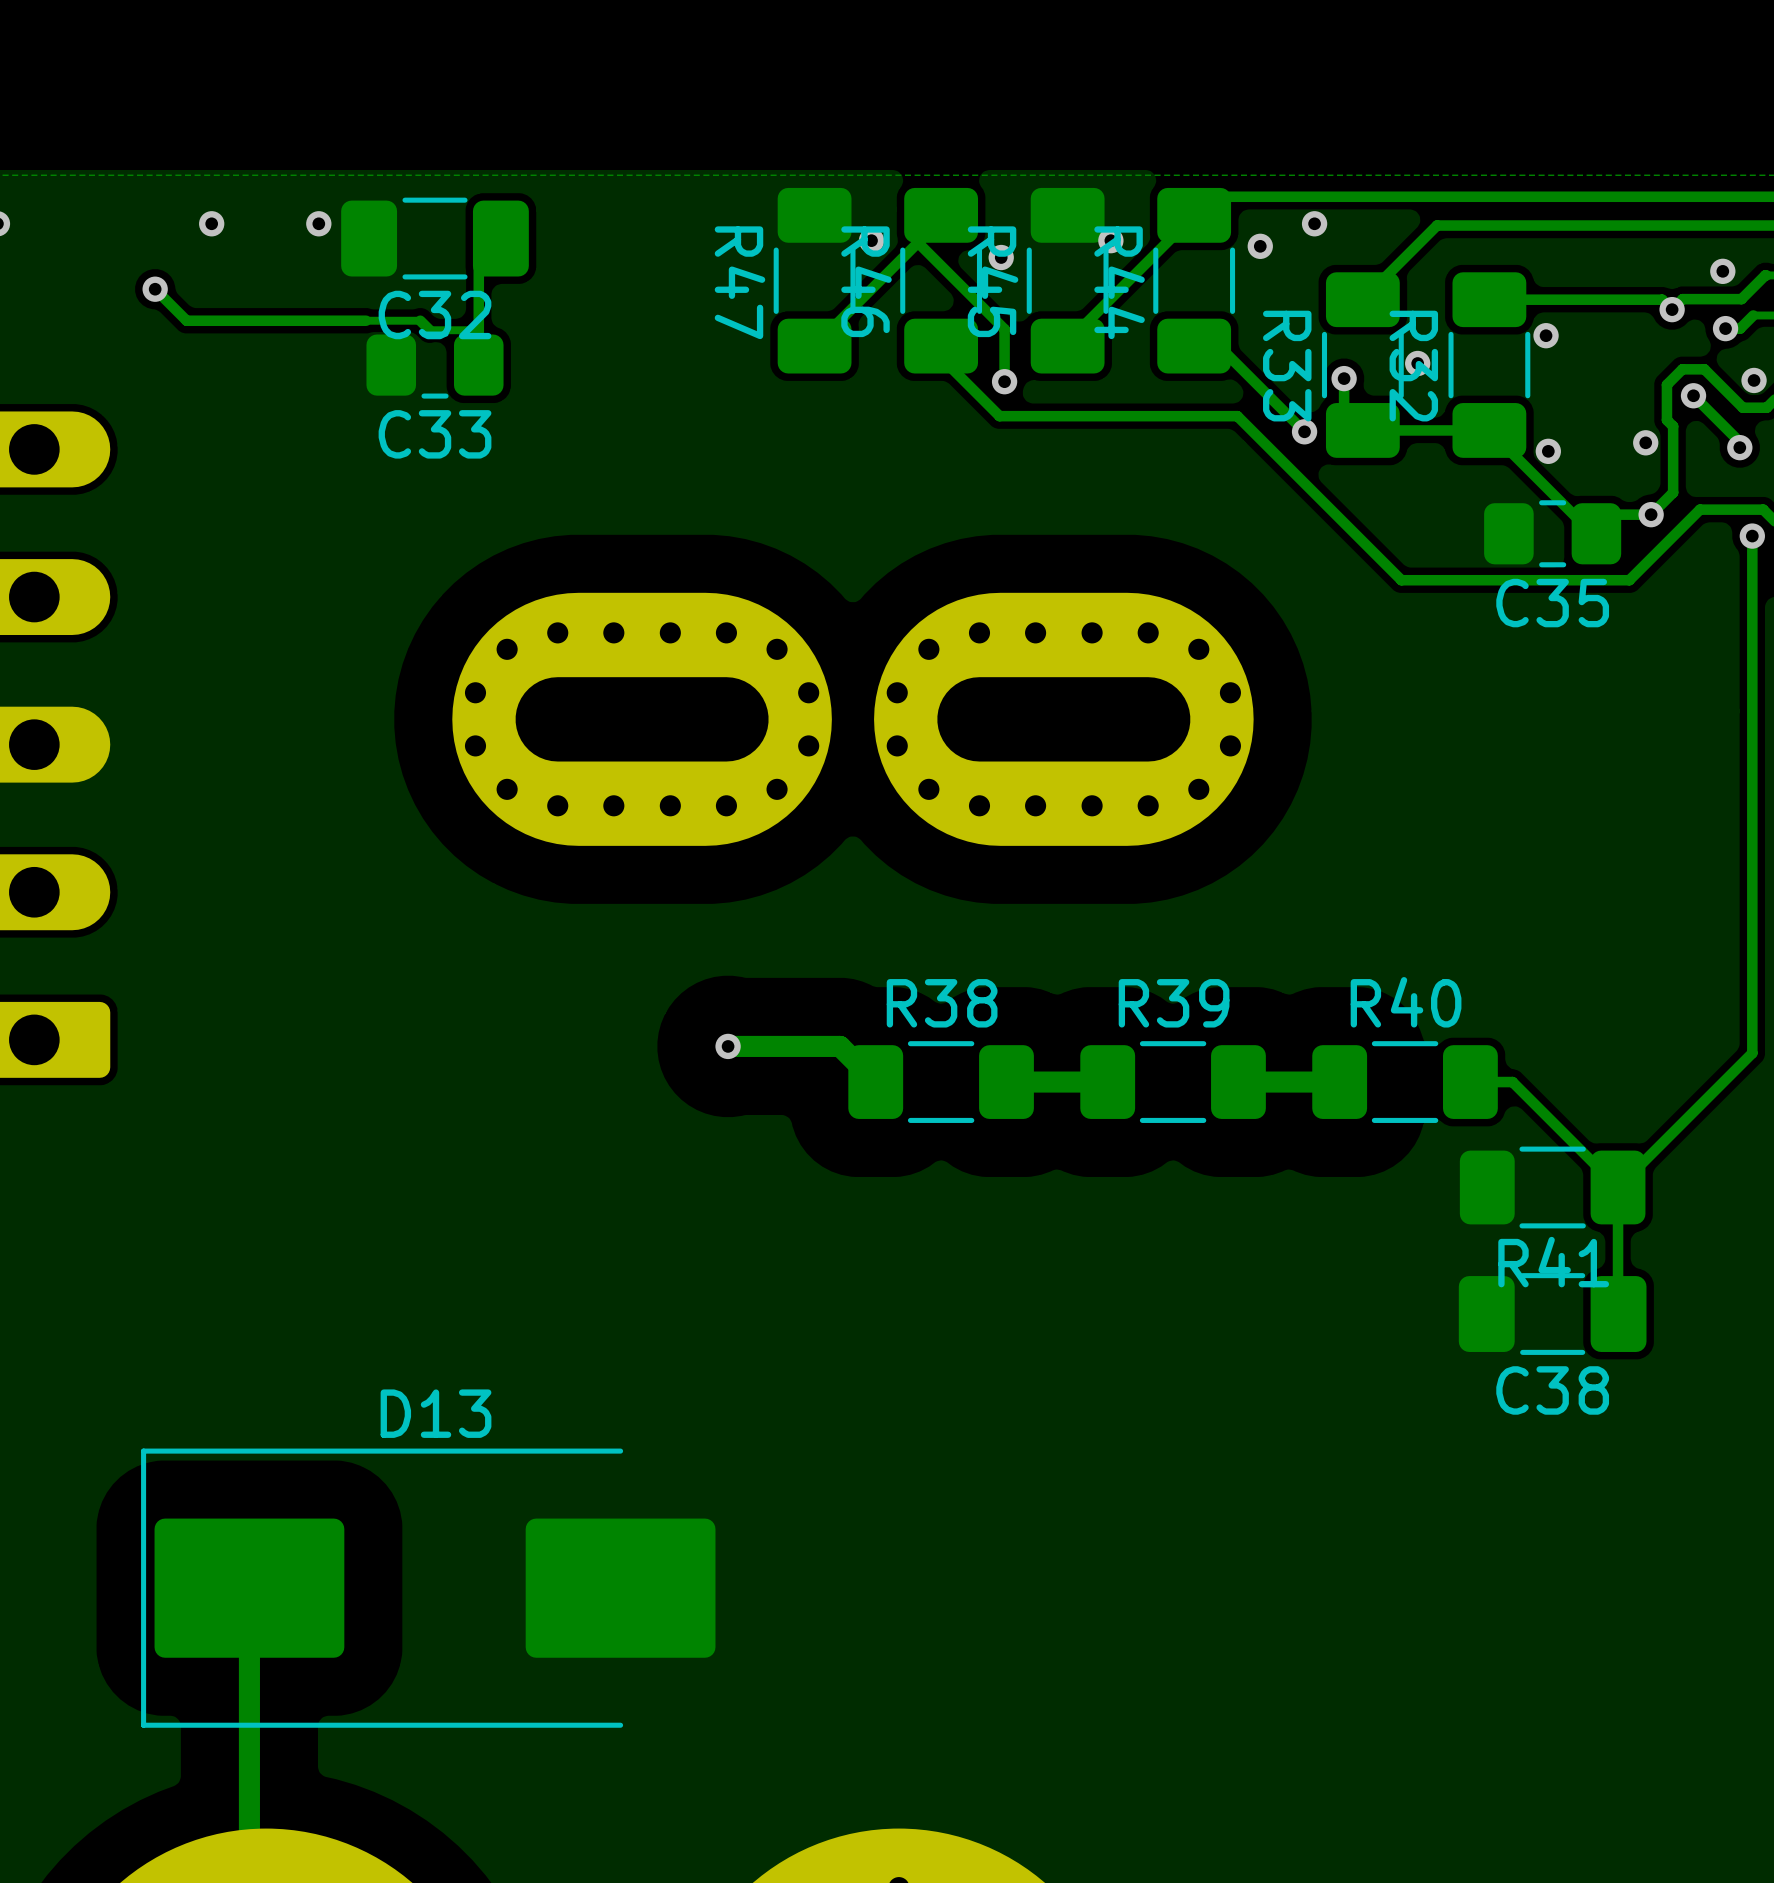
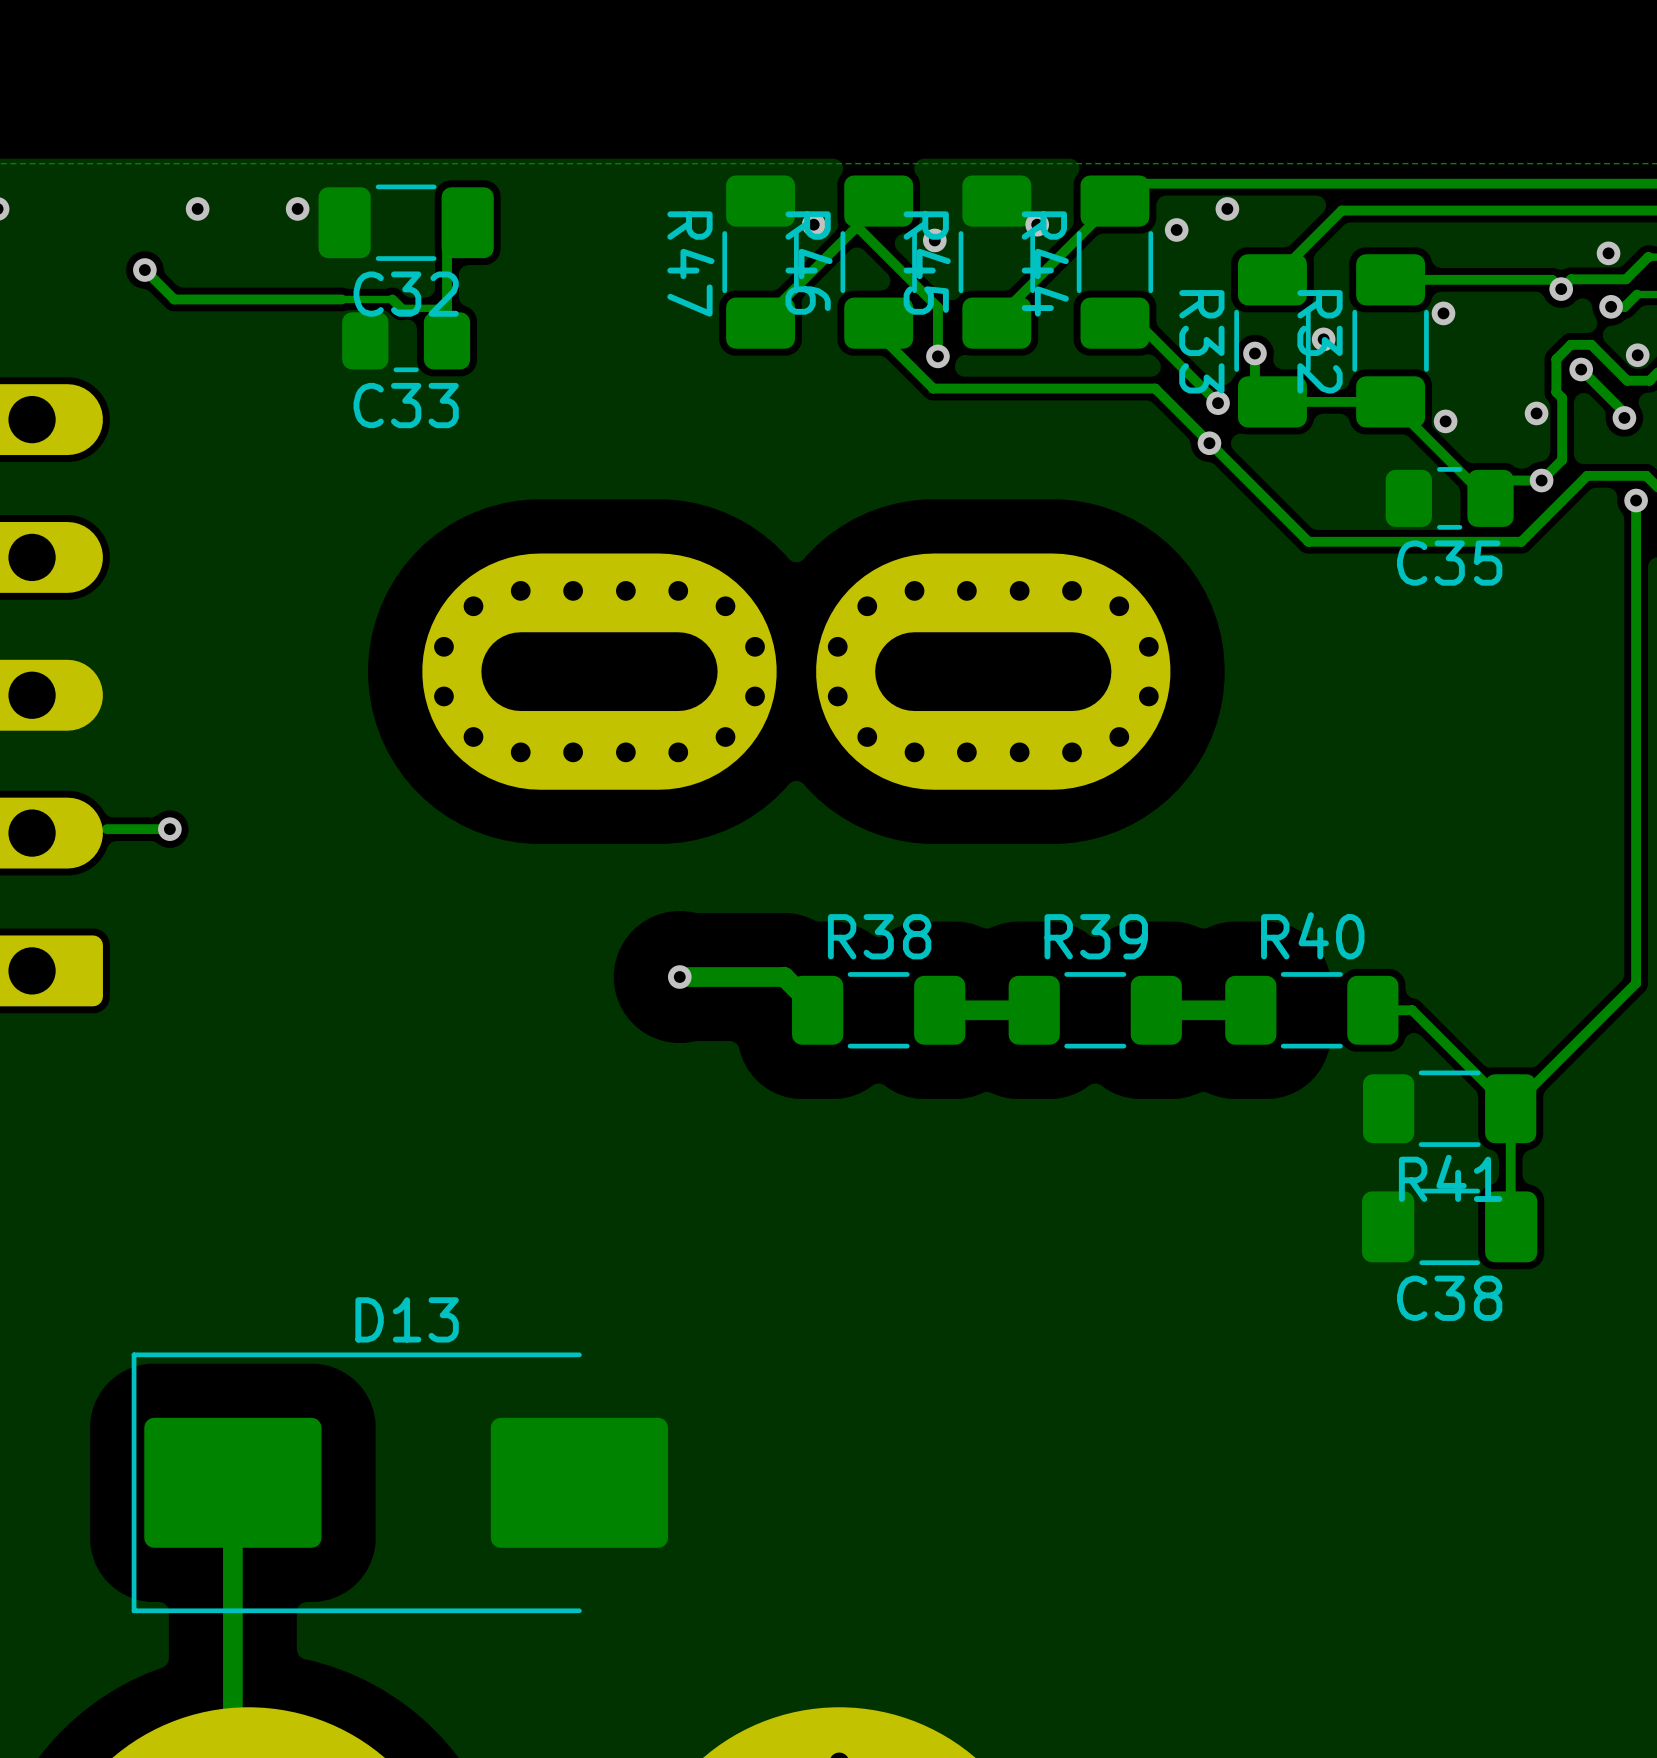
via: none -> (1209, 443)
track: none -> (169, 829) (106, 829)
via: none -> (169, 829)

